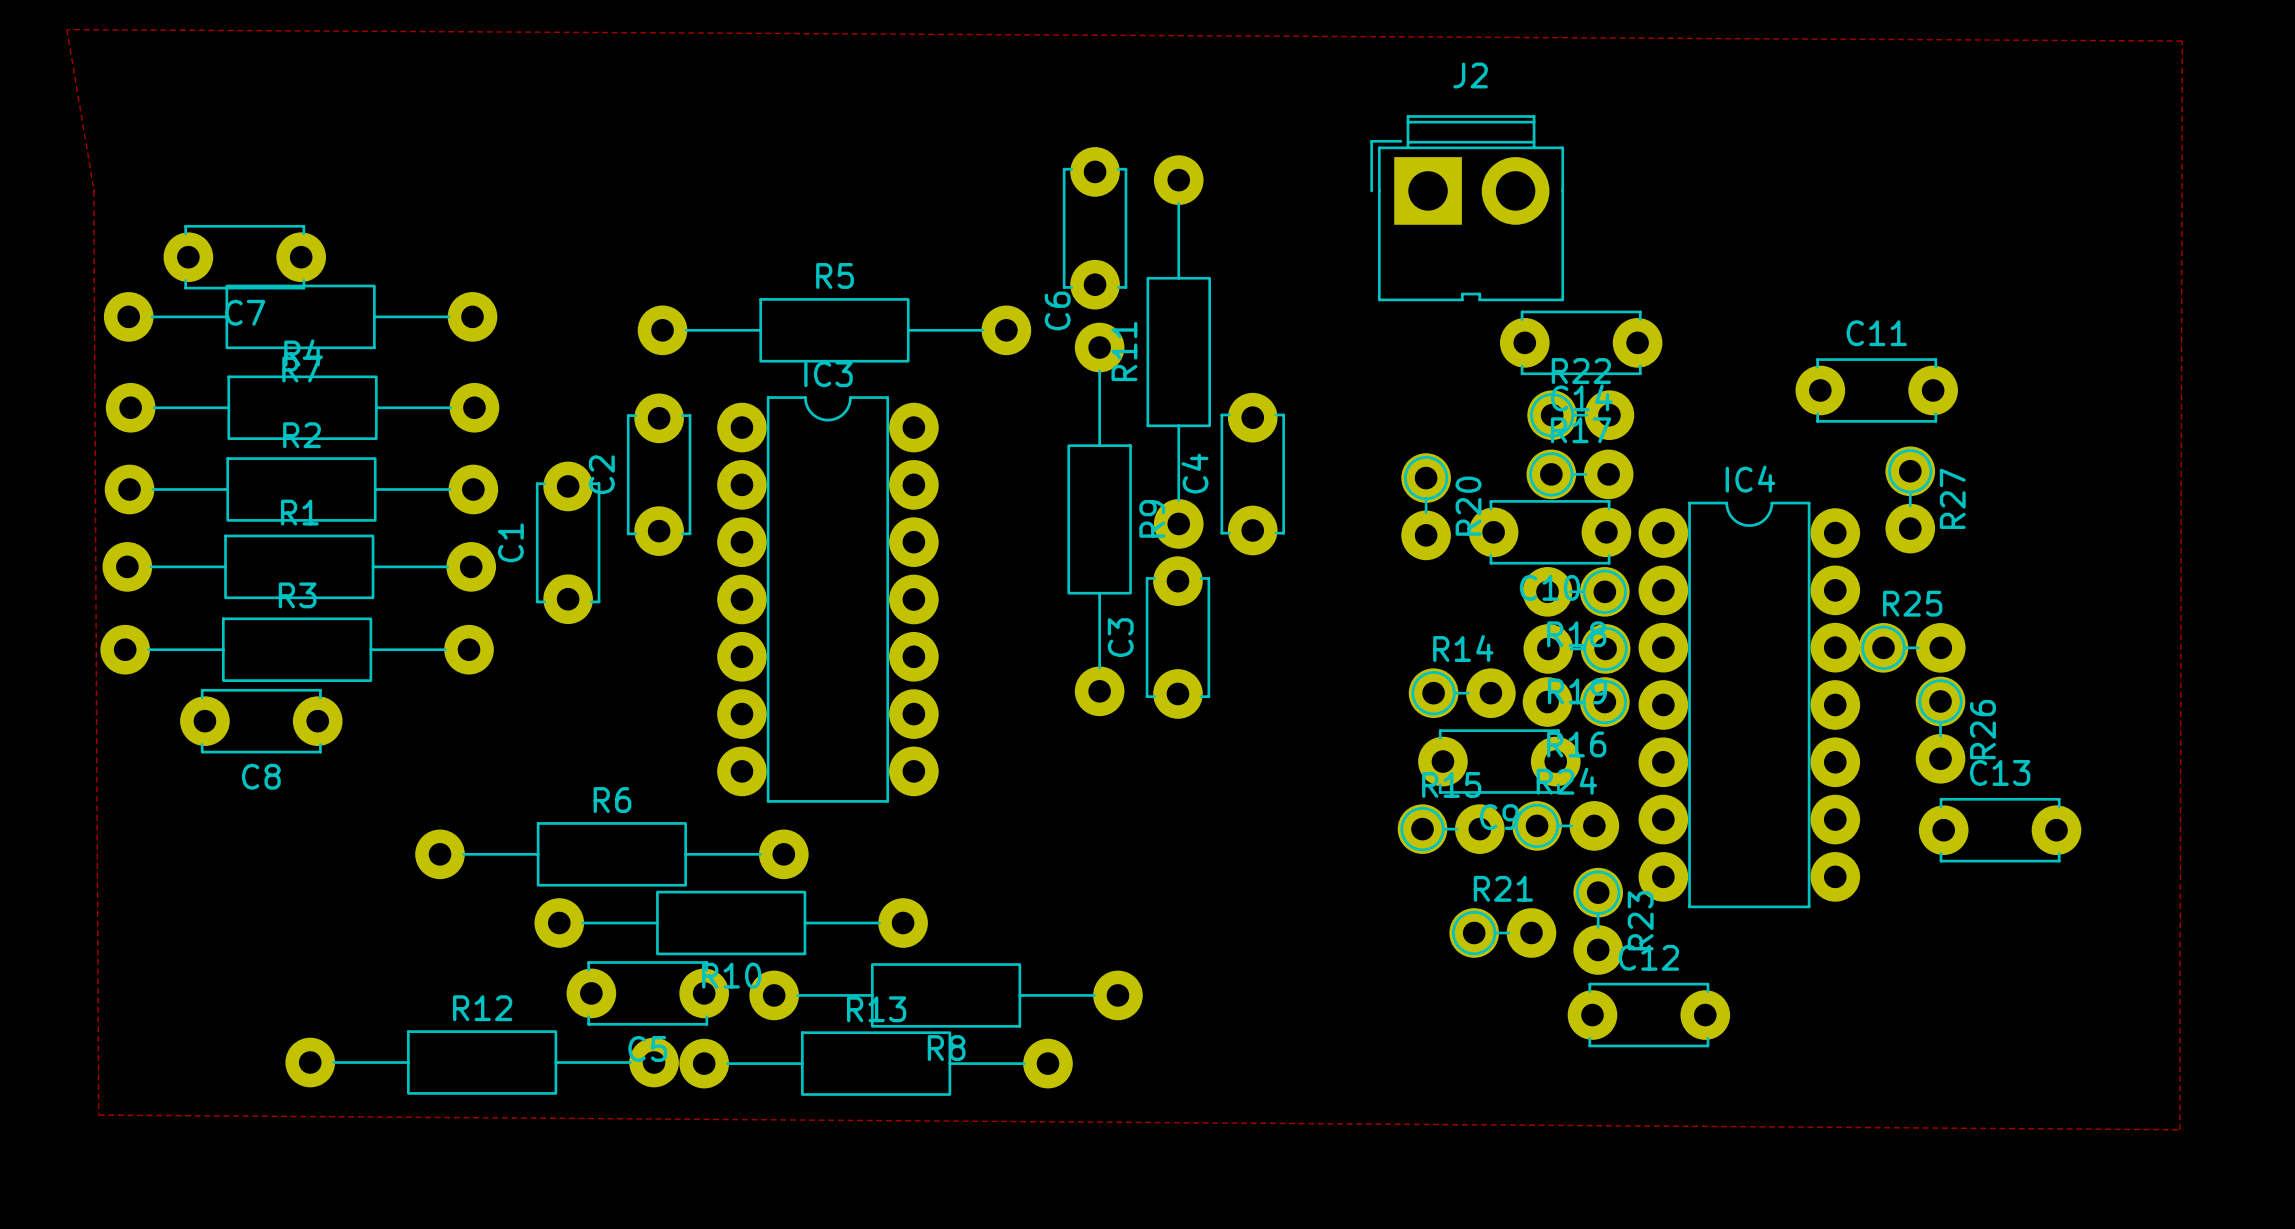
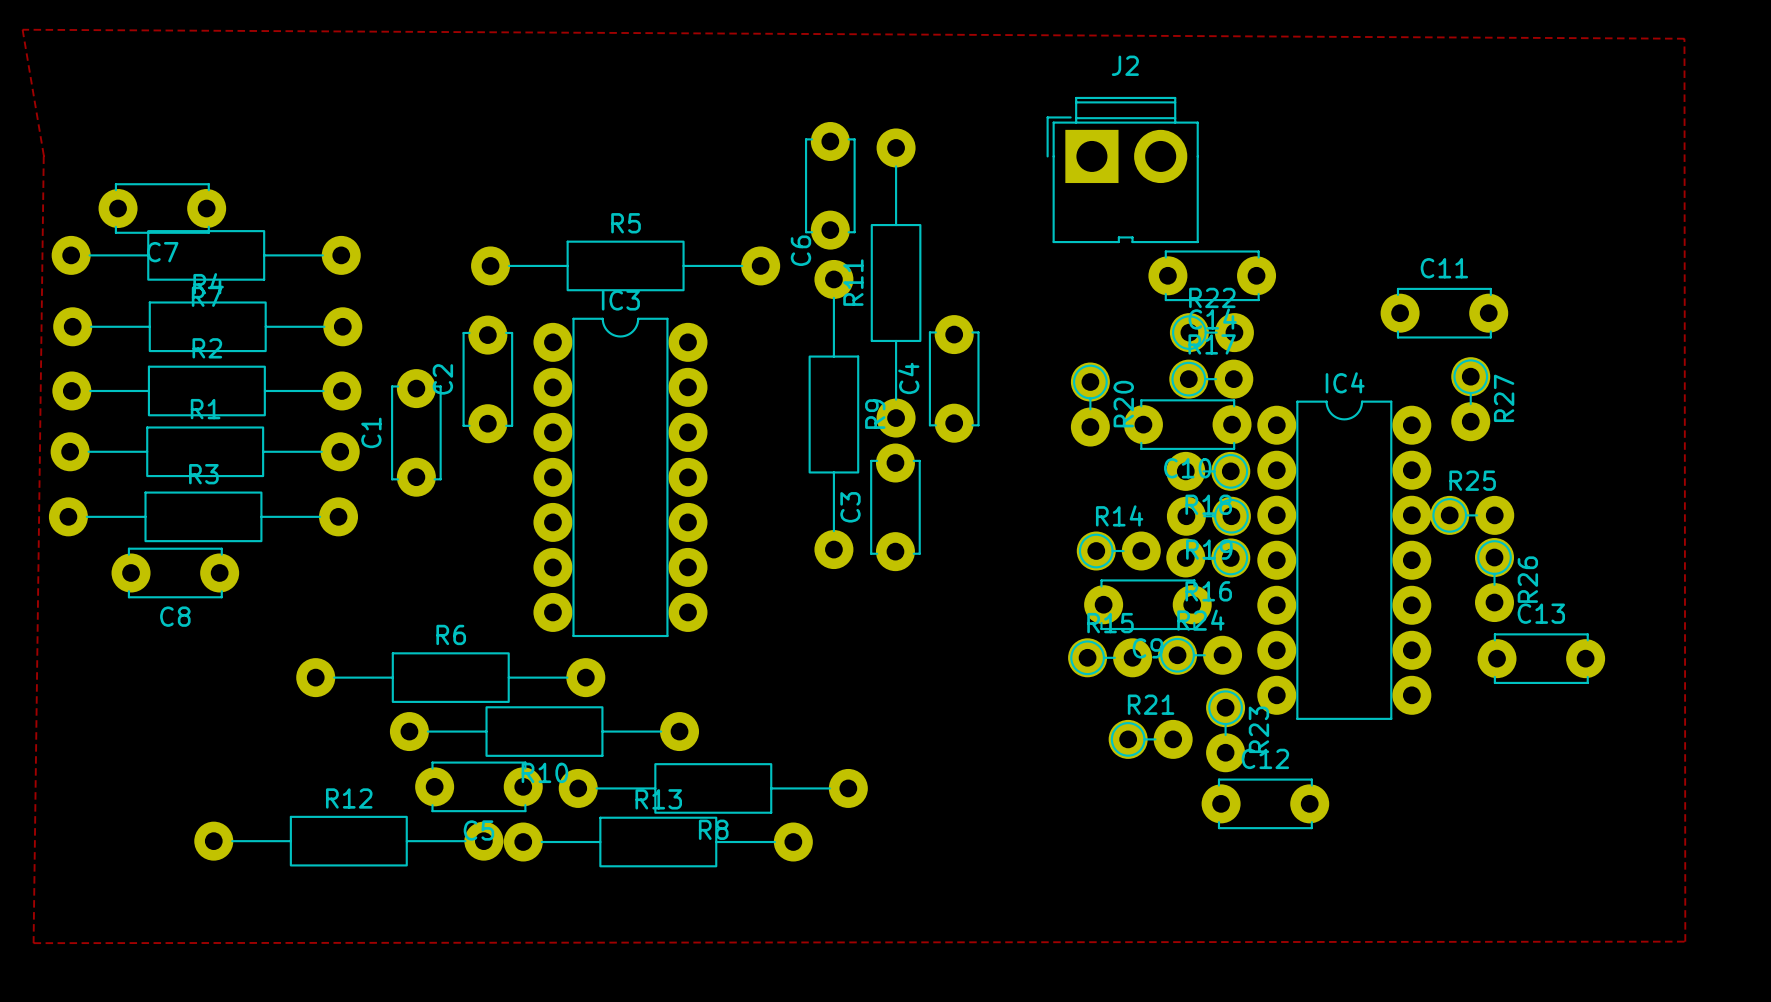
zone outline: (2182, 41) (2179, 1129) (98, 1115) (93, 190) -> (1684, 38) (1685, 941) (33, 943) (43, 156)

